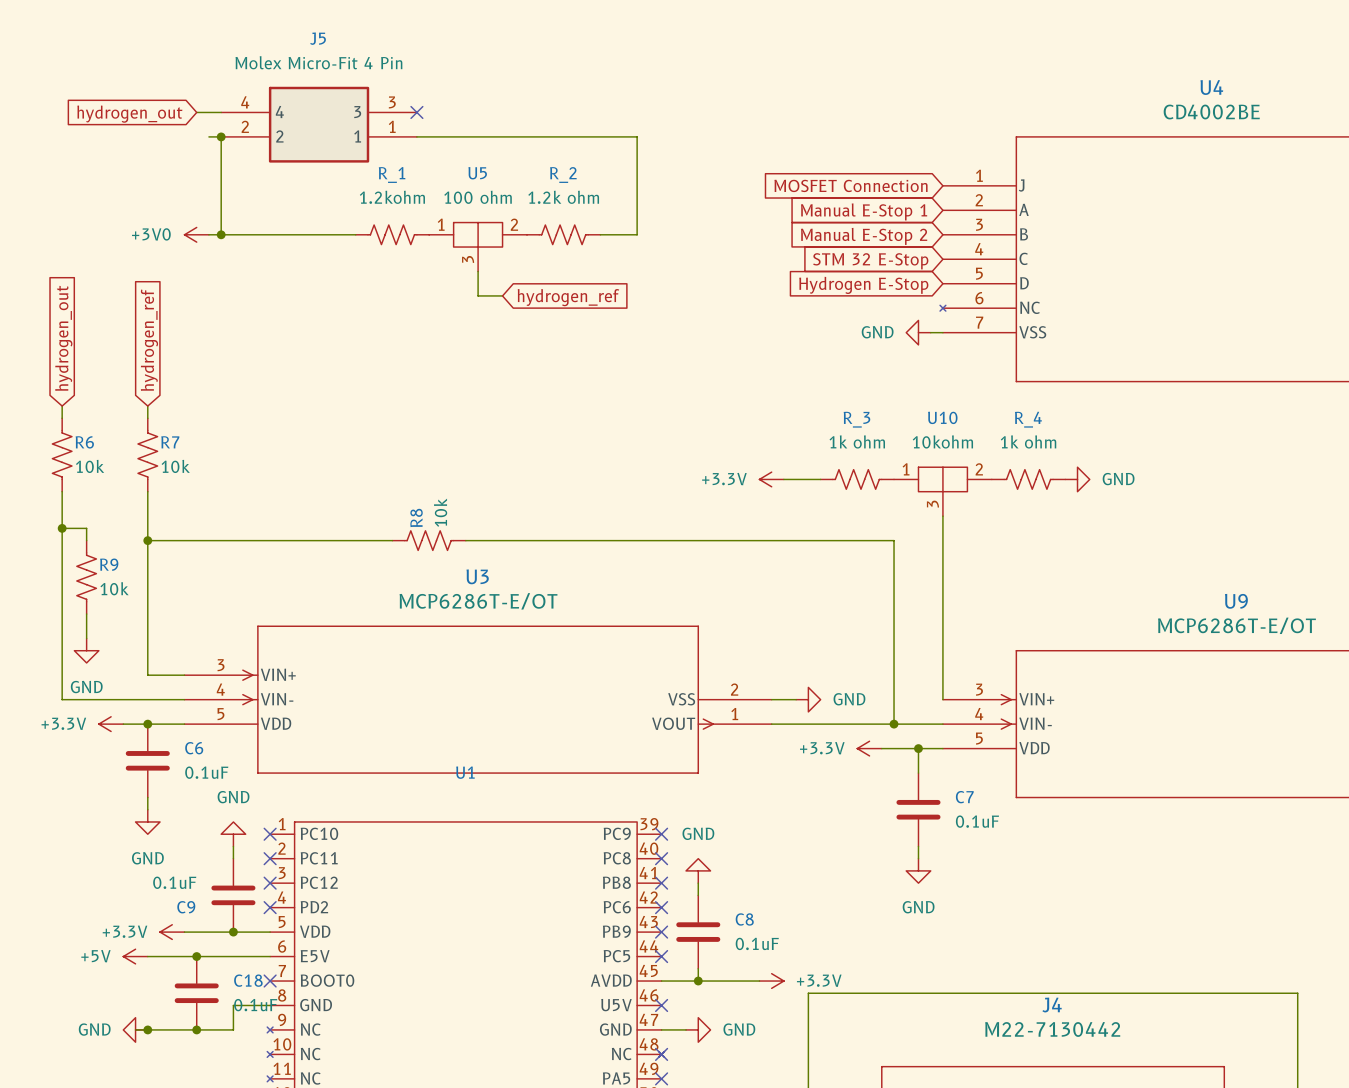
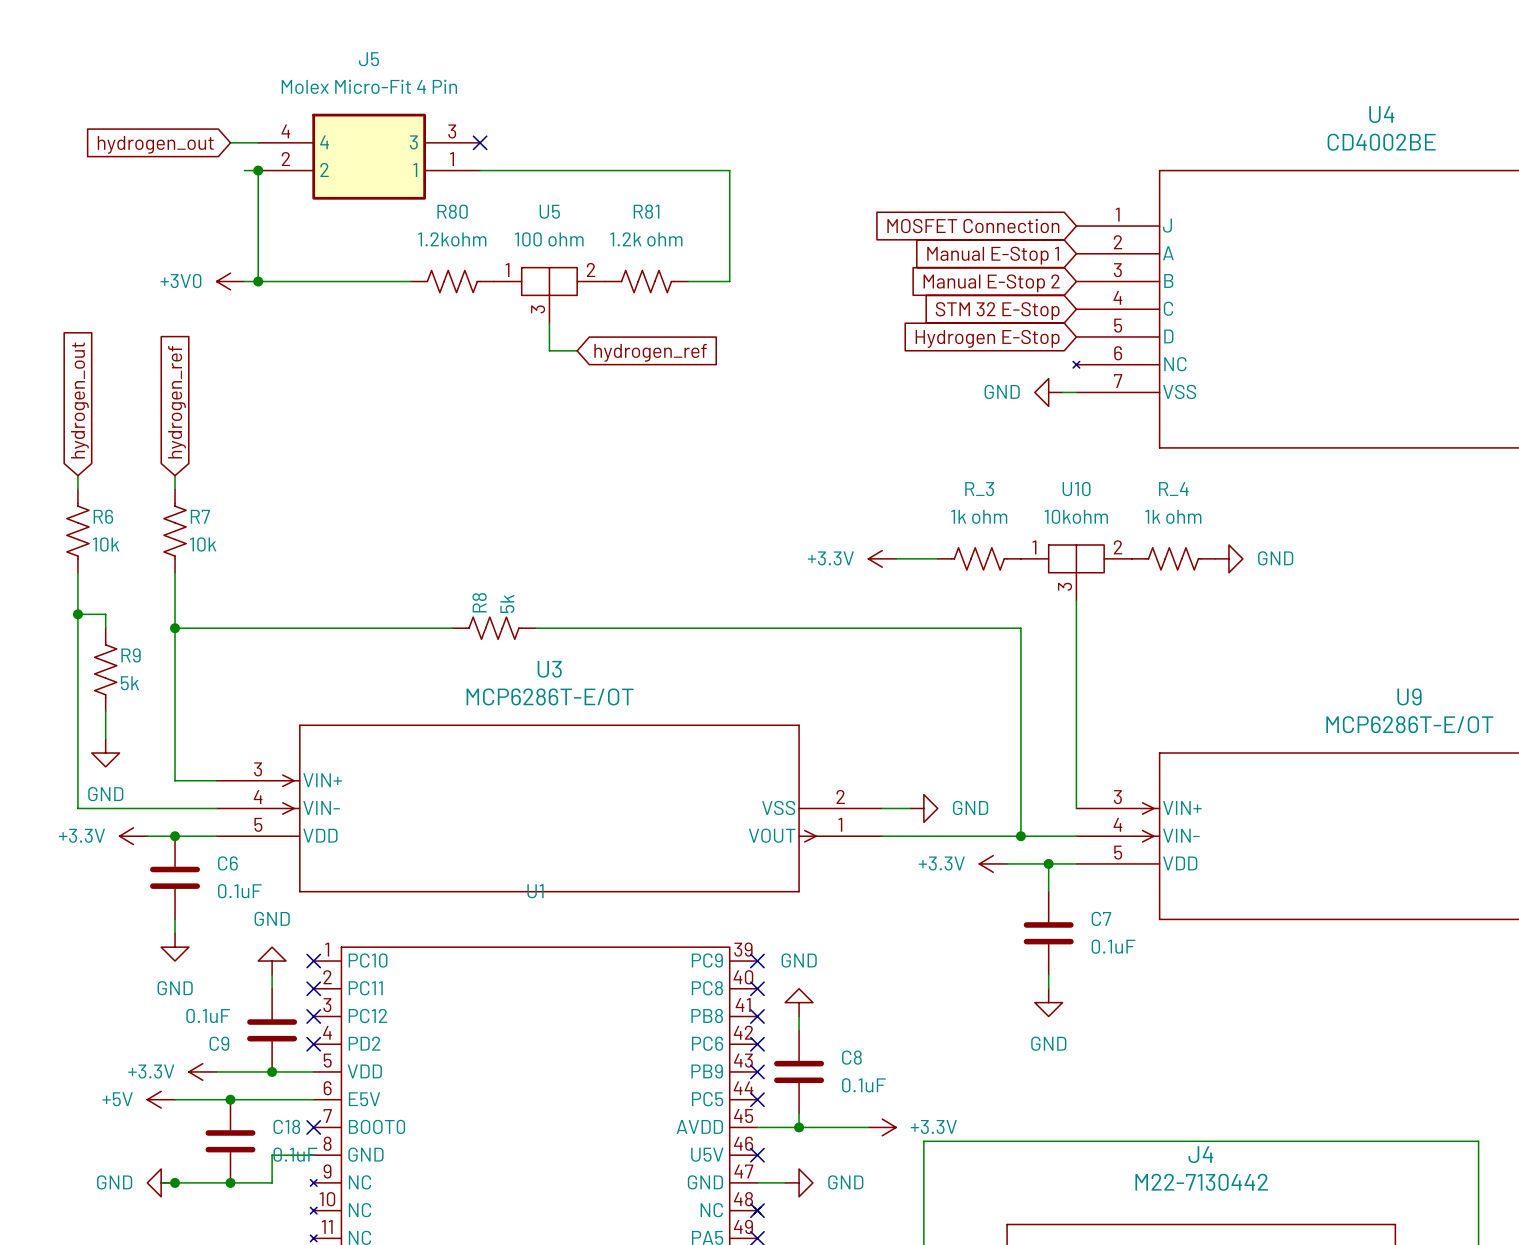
R_1 name: R_1 (392, 175) -> R80 (452, 211)
R_2 name: R_2 (563, 175) -> R81 (646, 211)
R8 value: 10k (440, 512) -> 5k (507, 603)
R9 value: 10k (114, 588) -> 5k (129, 683)

